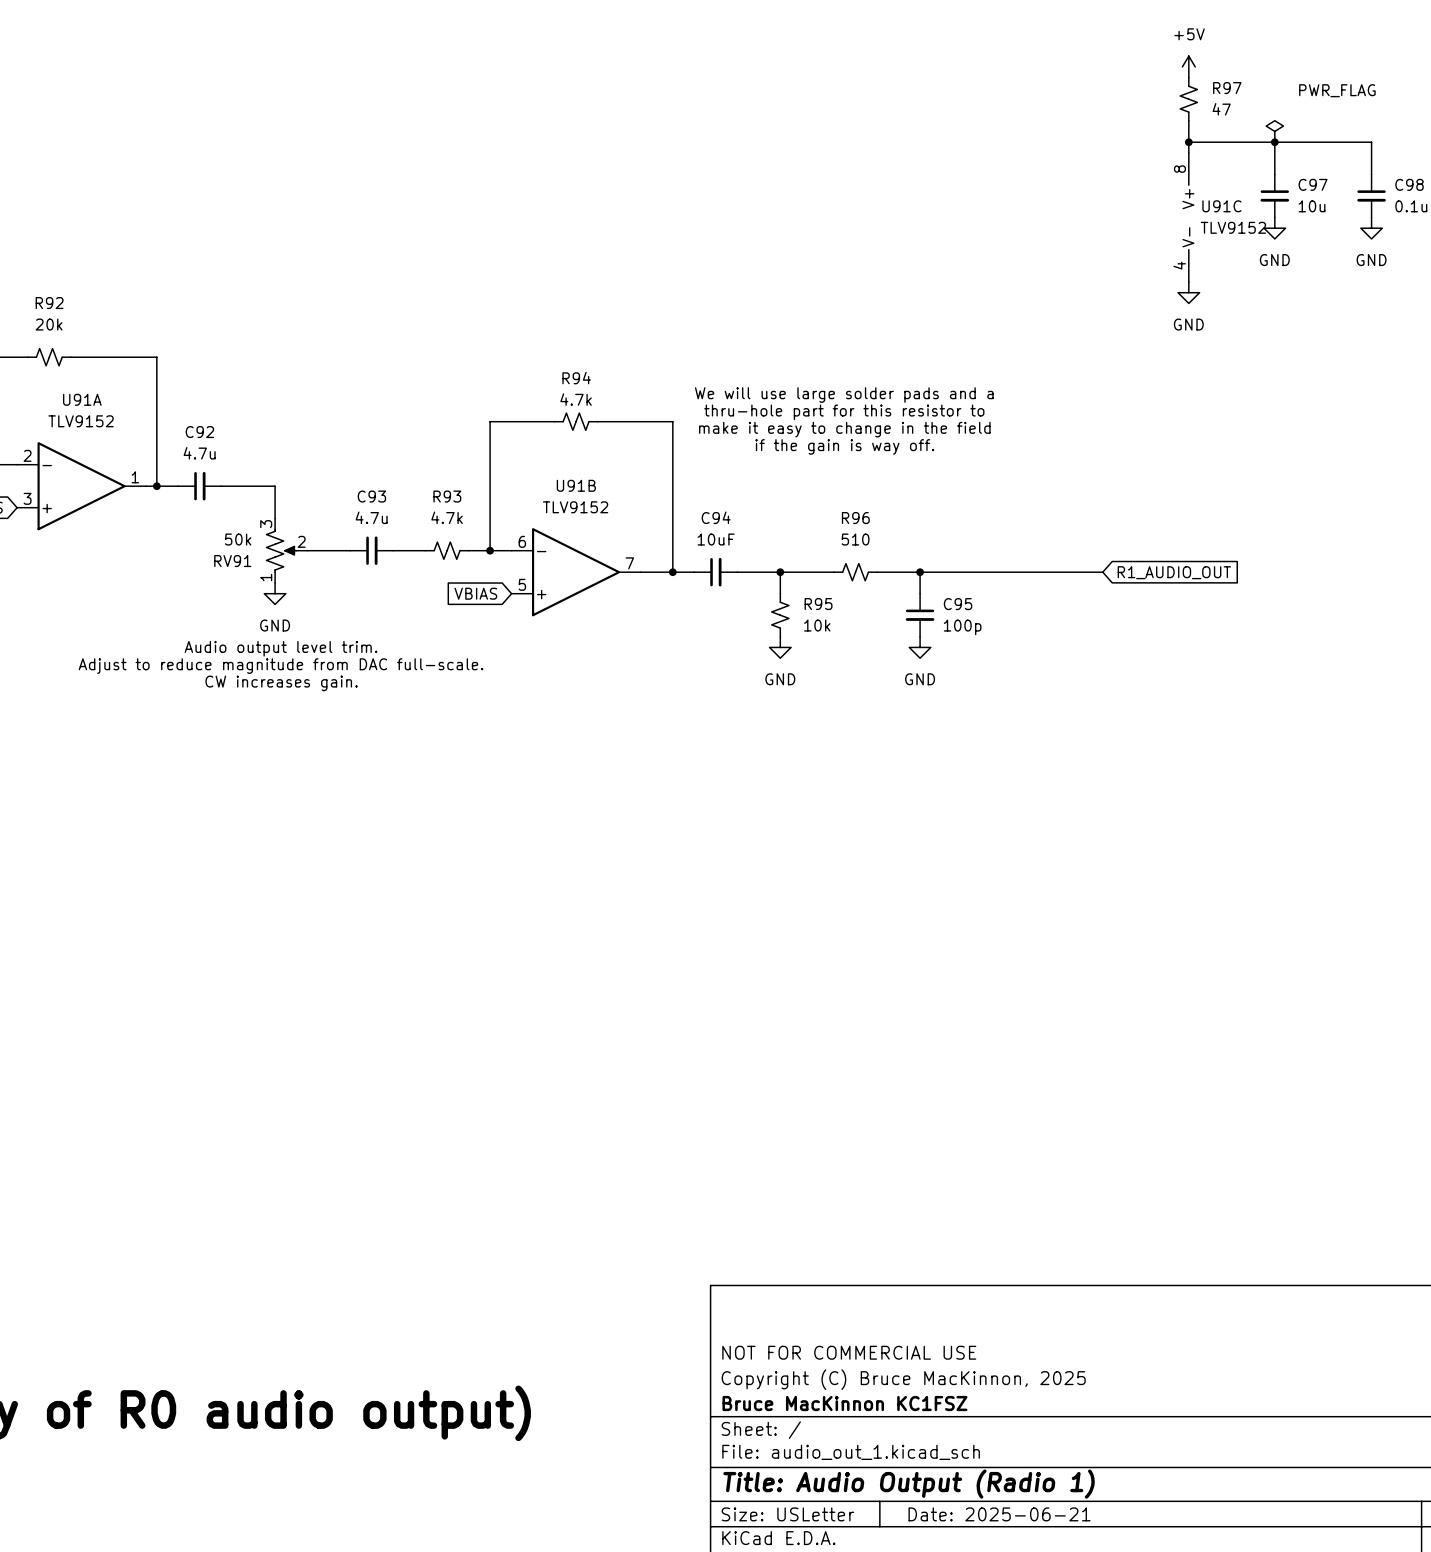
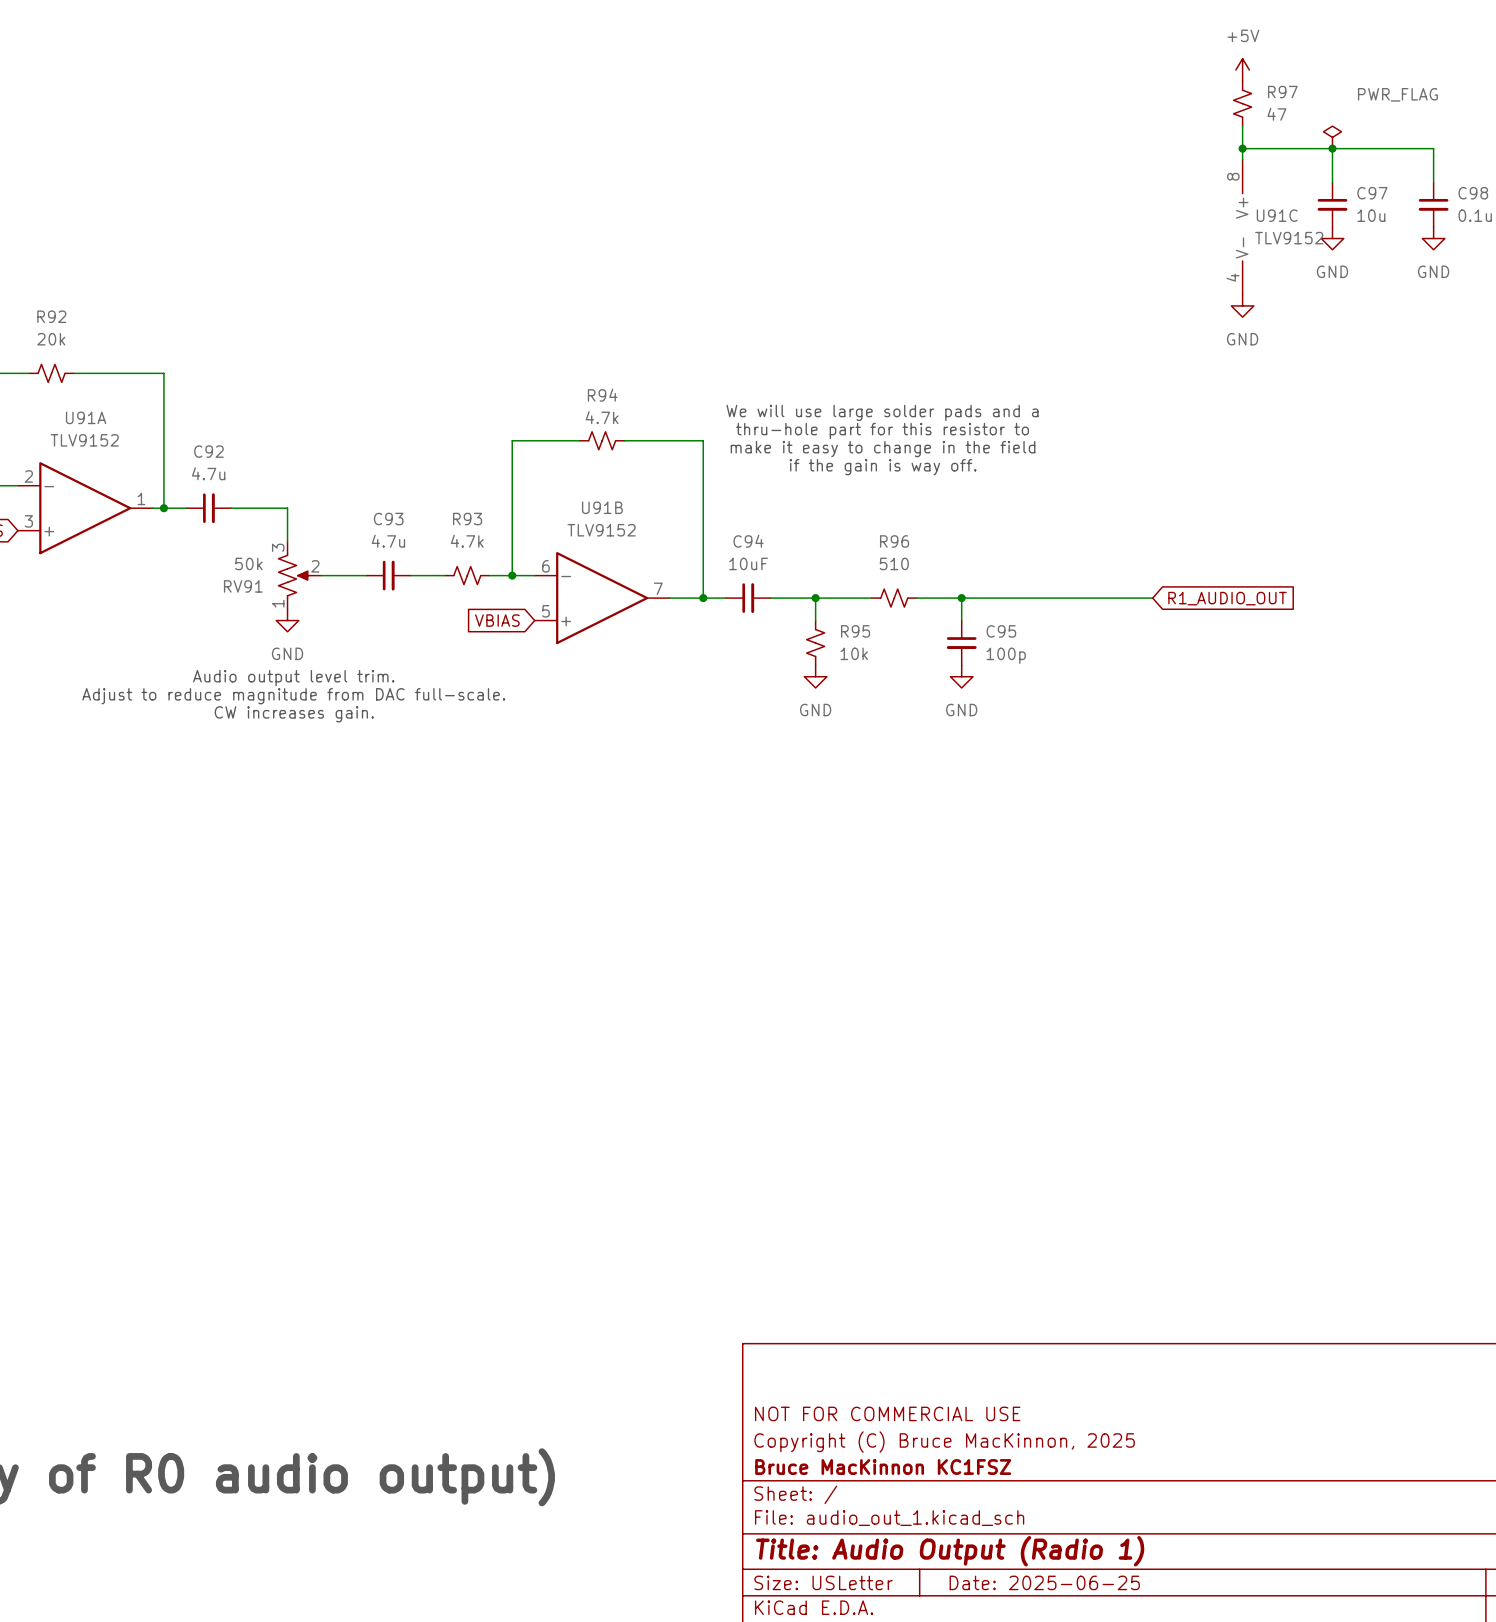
title block: Date: 2025-06-21 (999, 1514) -> Date: 2025-06-25 (1044, 1582)

